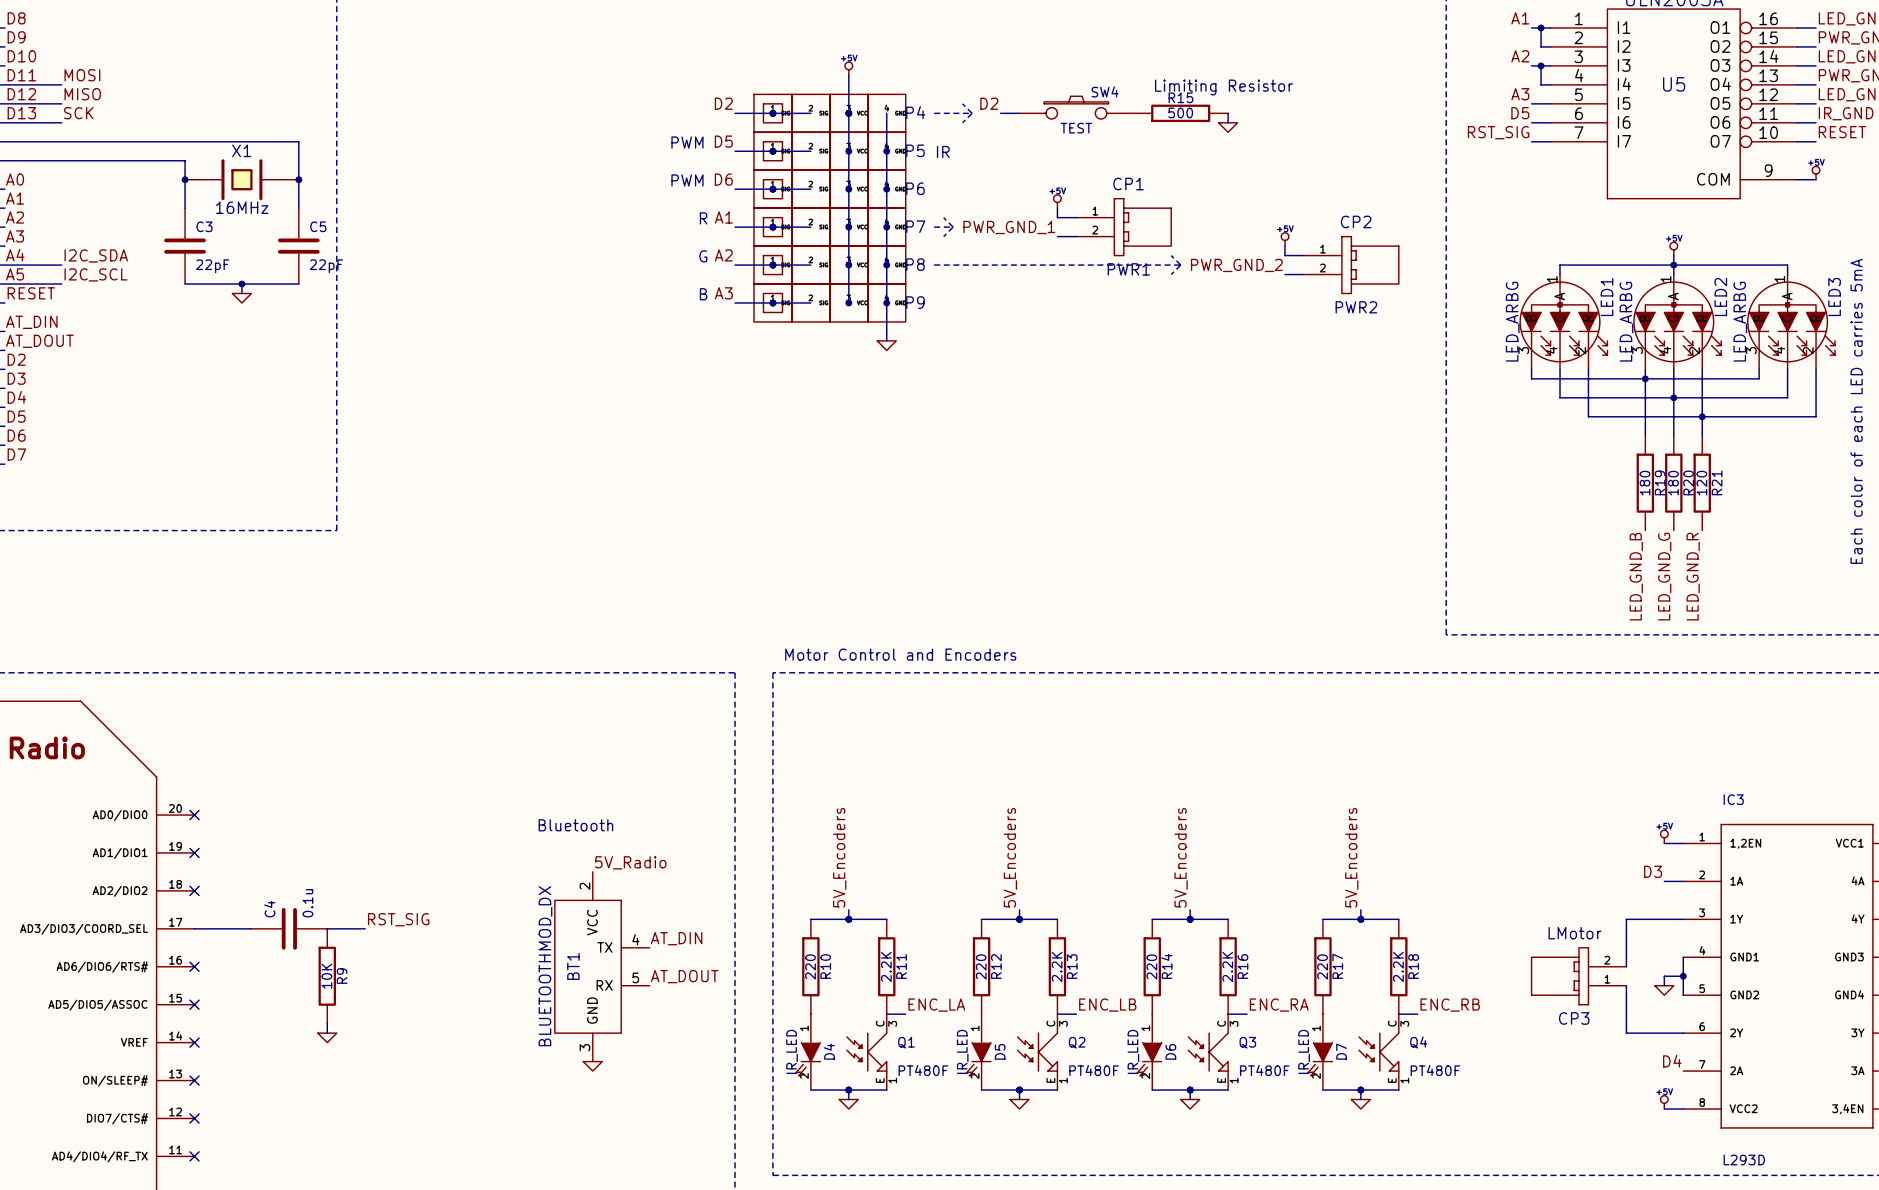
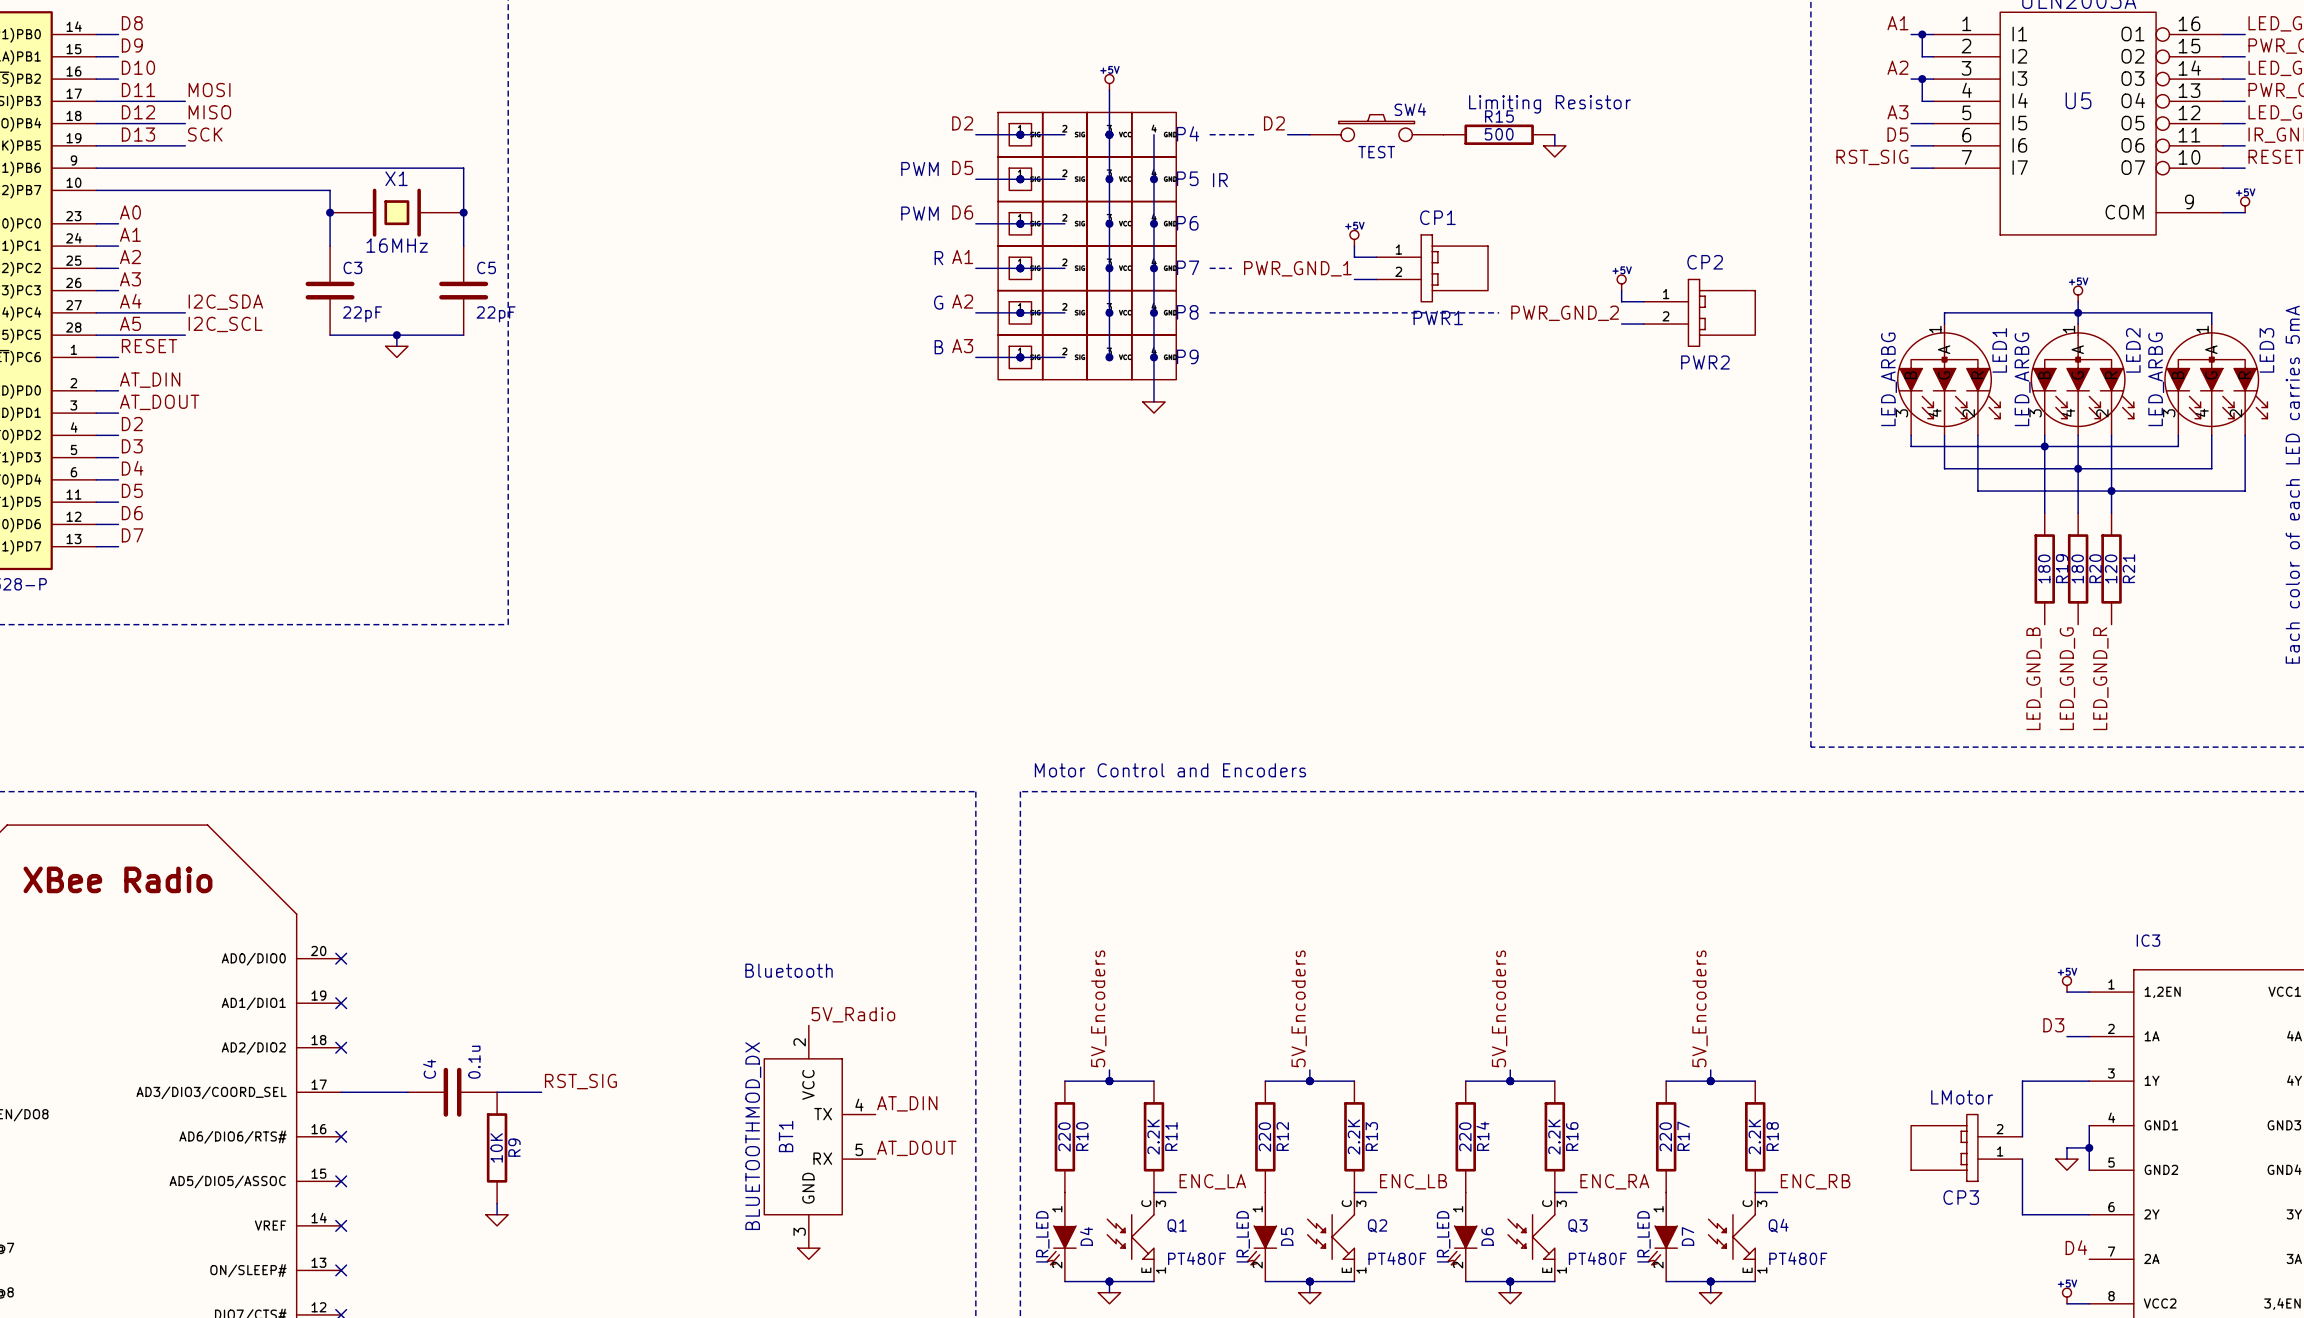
line: (962, 103) (972, 113) (962, 122) -> none
line: (943, 217) (953, 227) (943, 236) -> none
line: (1171, 255) (1180, 265) (1171, 274) -> none

